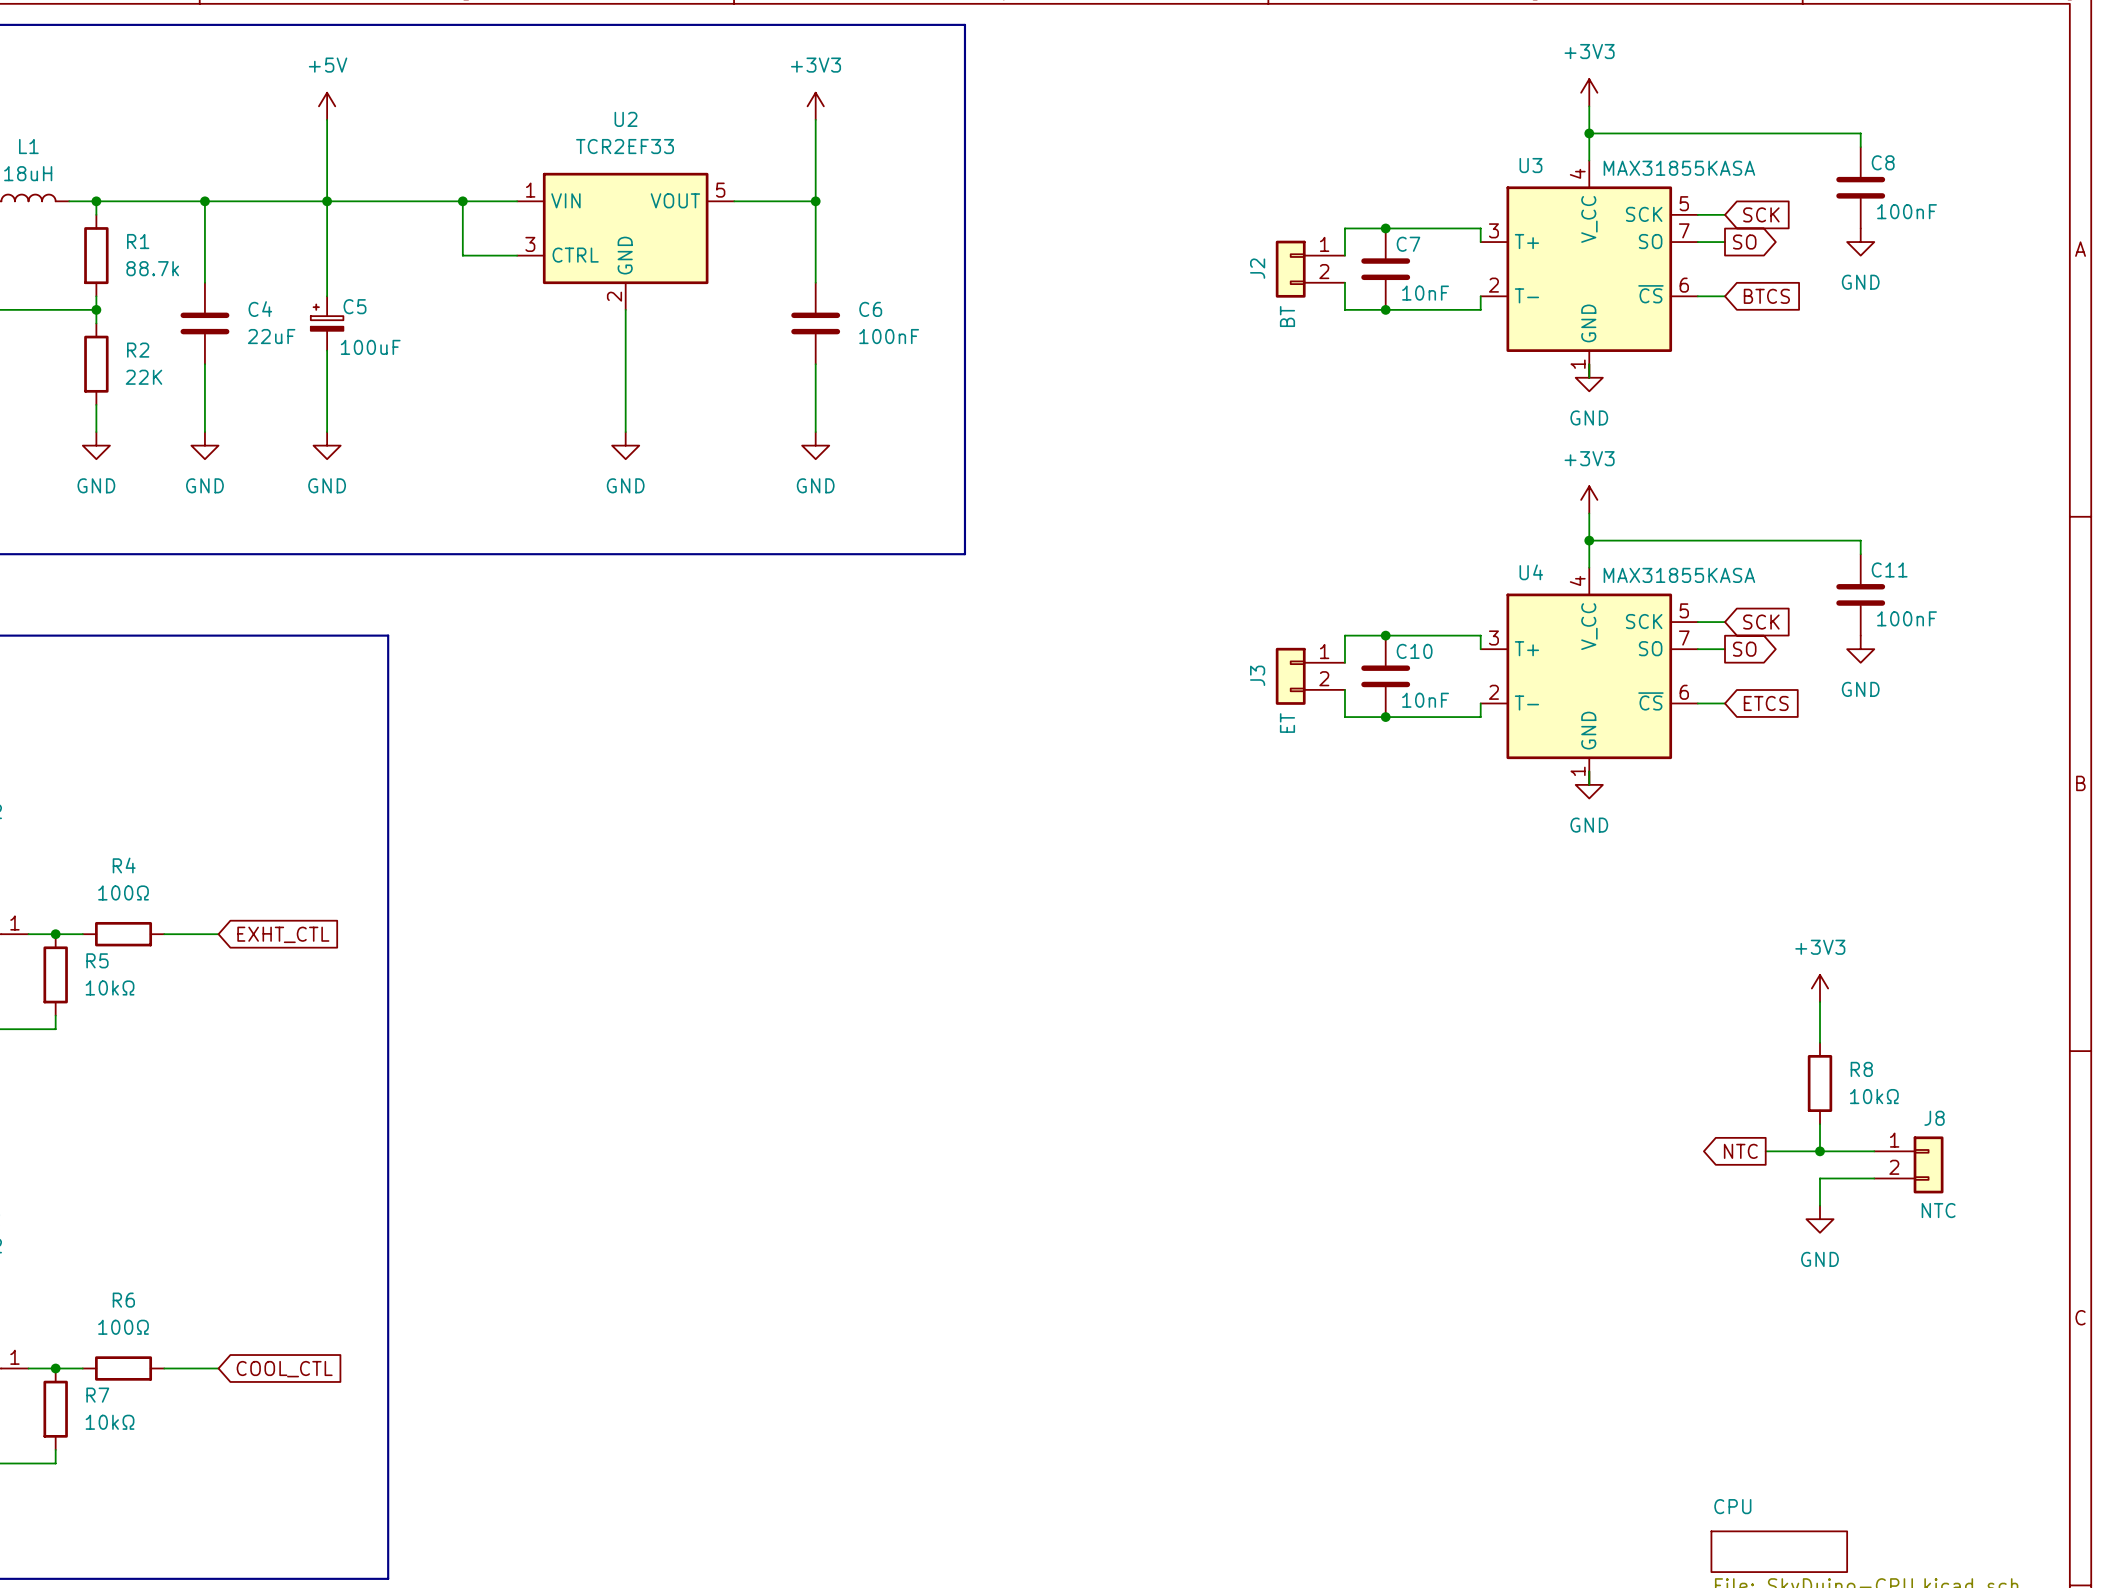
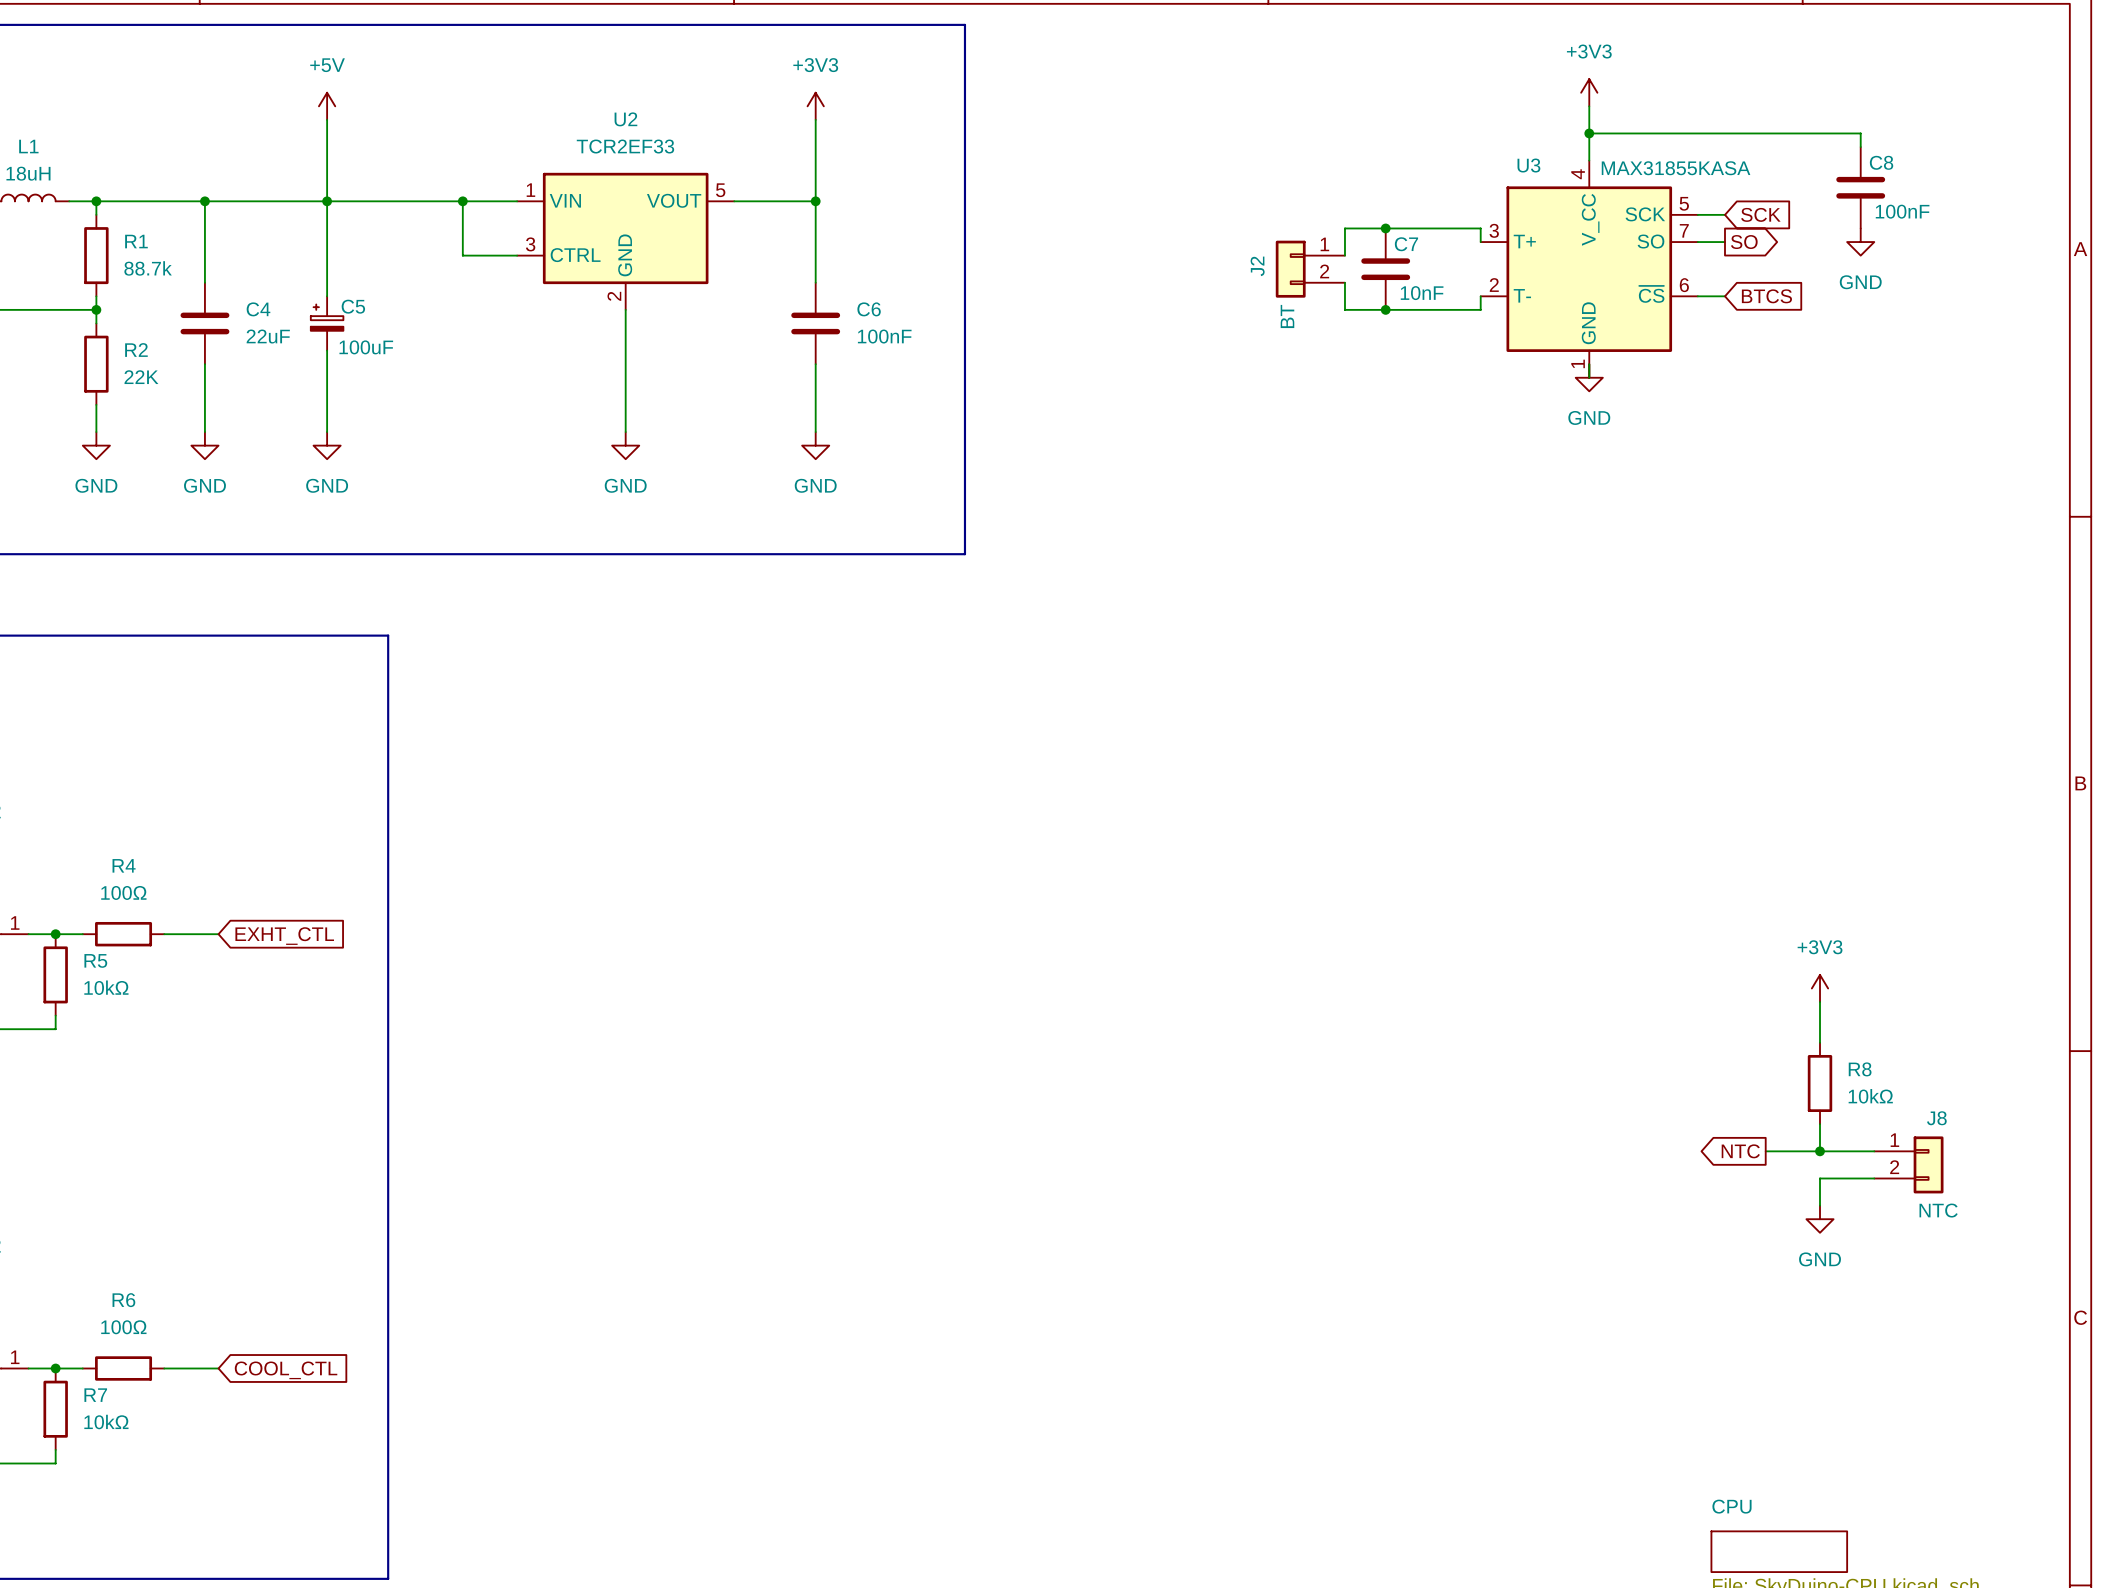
power symbol: +3V3 (1589, 499) -> none
wire: (1589, 513) (1589, 567) -> none
wire: (1589, 540) (1860, 540) (1860, 554) -> none
junction: (1589, 540) -> none
C11: 100nF (1860, 594) -> none
wire: (1697, 622) (1724, 622) -> none
global label: SCK (1761, 622) -> none
junction: (1385, 635) -> none
wire: (1480, 649) (1480, 635) (1344, 635) (1344, 662) -> none
wire: (1697, 649) (1724, 649) -> none
global label: SO (1744, 649) -> none
power symbol: GND (1860, 649) -> none
J3: ET (1310, 676) -> none
C10: 10nF (1385, 676) -> none
U4: MAX31855KASA (1589, 676) -> none
wire: (1344, 689) (1344, 717) (1480, 717) (1480, 703) -> none
wire: (1697, 703) (1724, 703) -> none
global label: ETCS (1766, 703) -> none
junction: (1385, 717) -> none
wire: (1589, 771) (1589, 784) -> none
power symbol: GND (1589, 784) -> none

